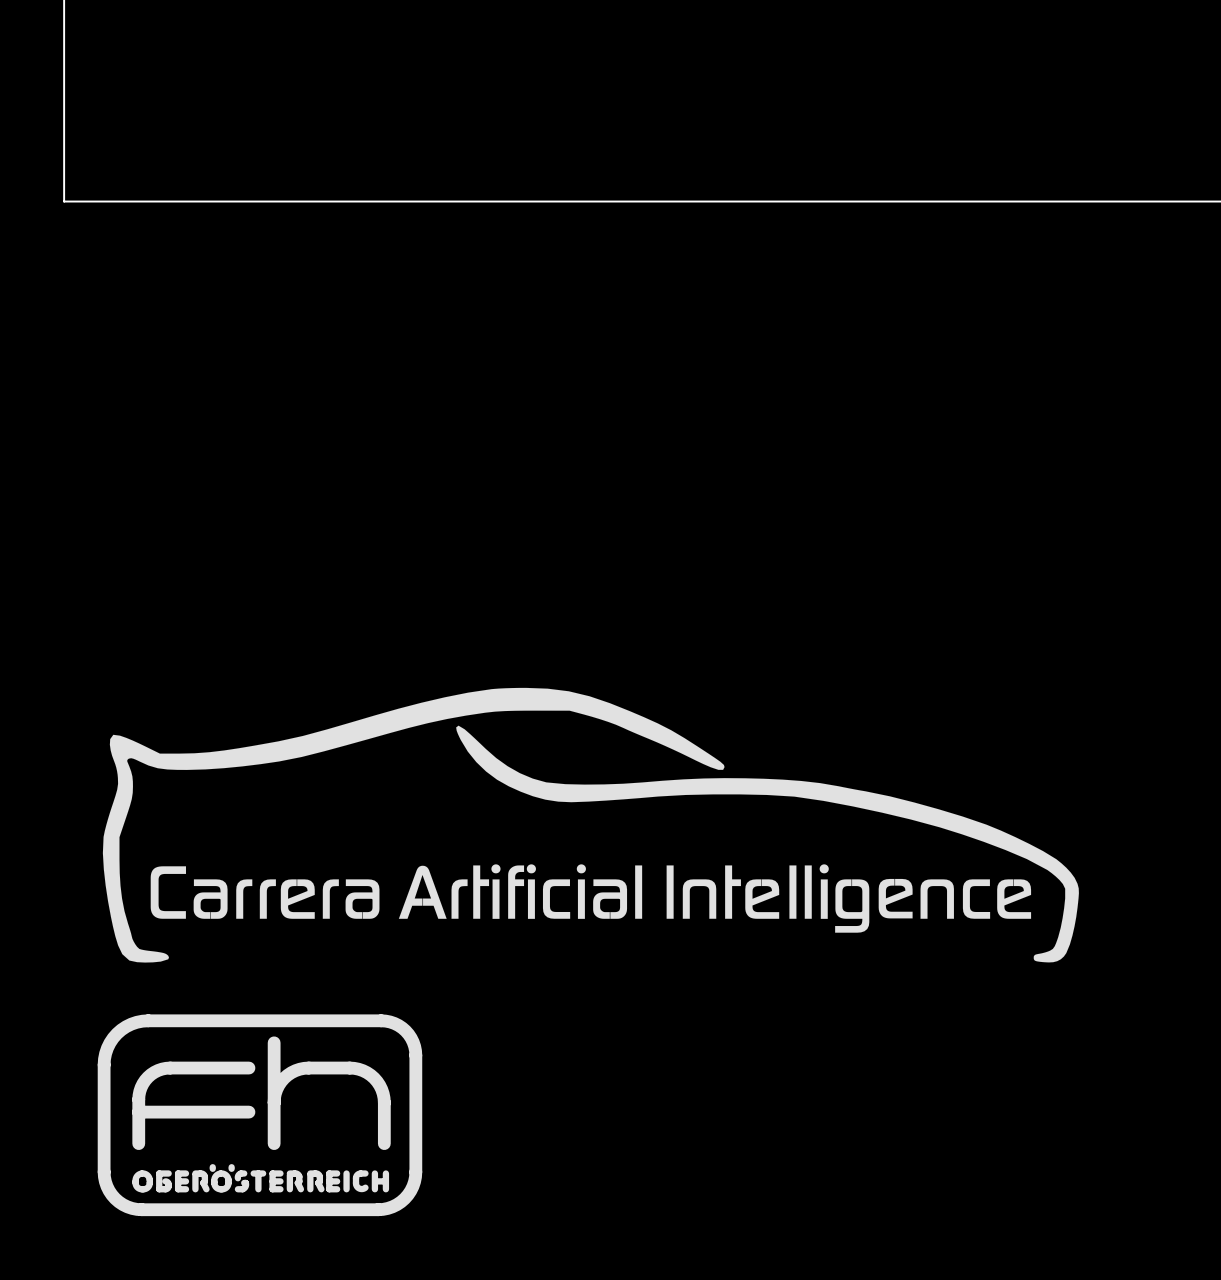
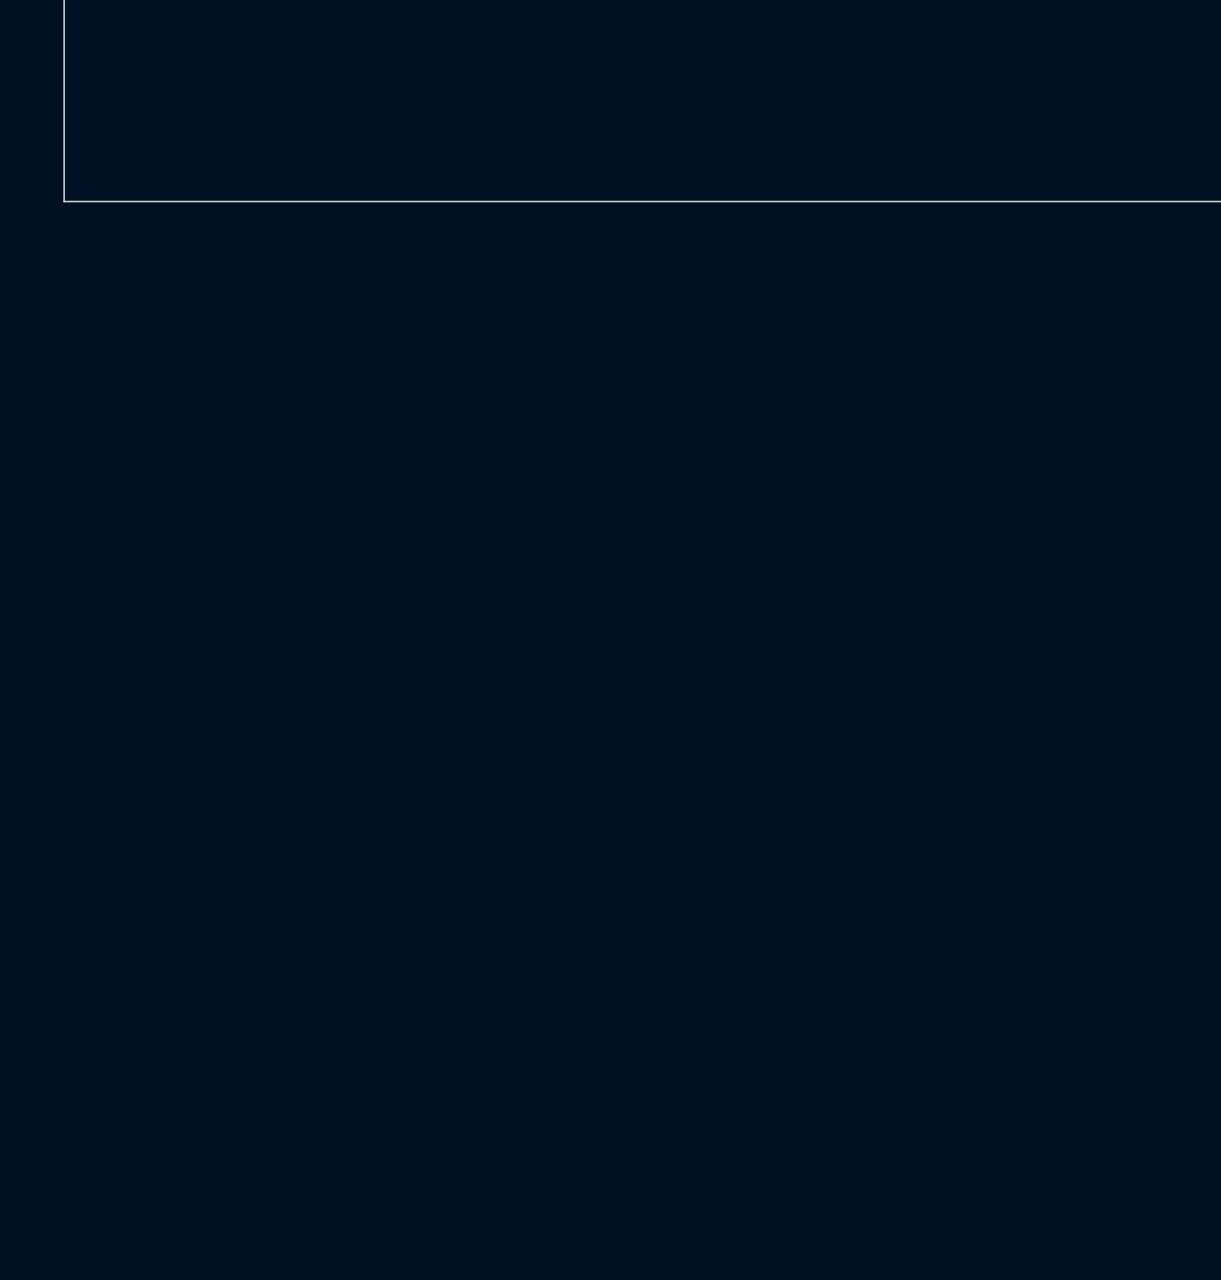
drawing: [102, 687, 1079, 963] -> none
drawing: [97, 1014, 423, 1217] -> none

